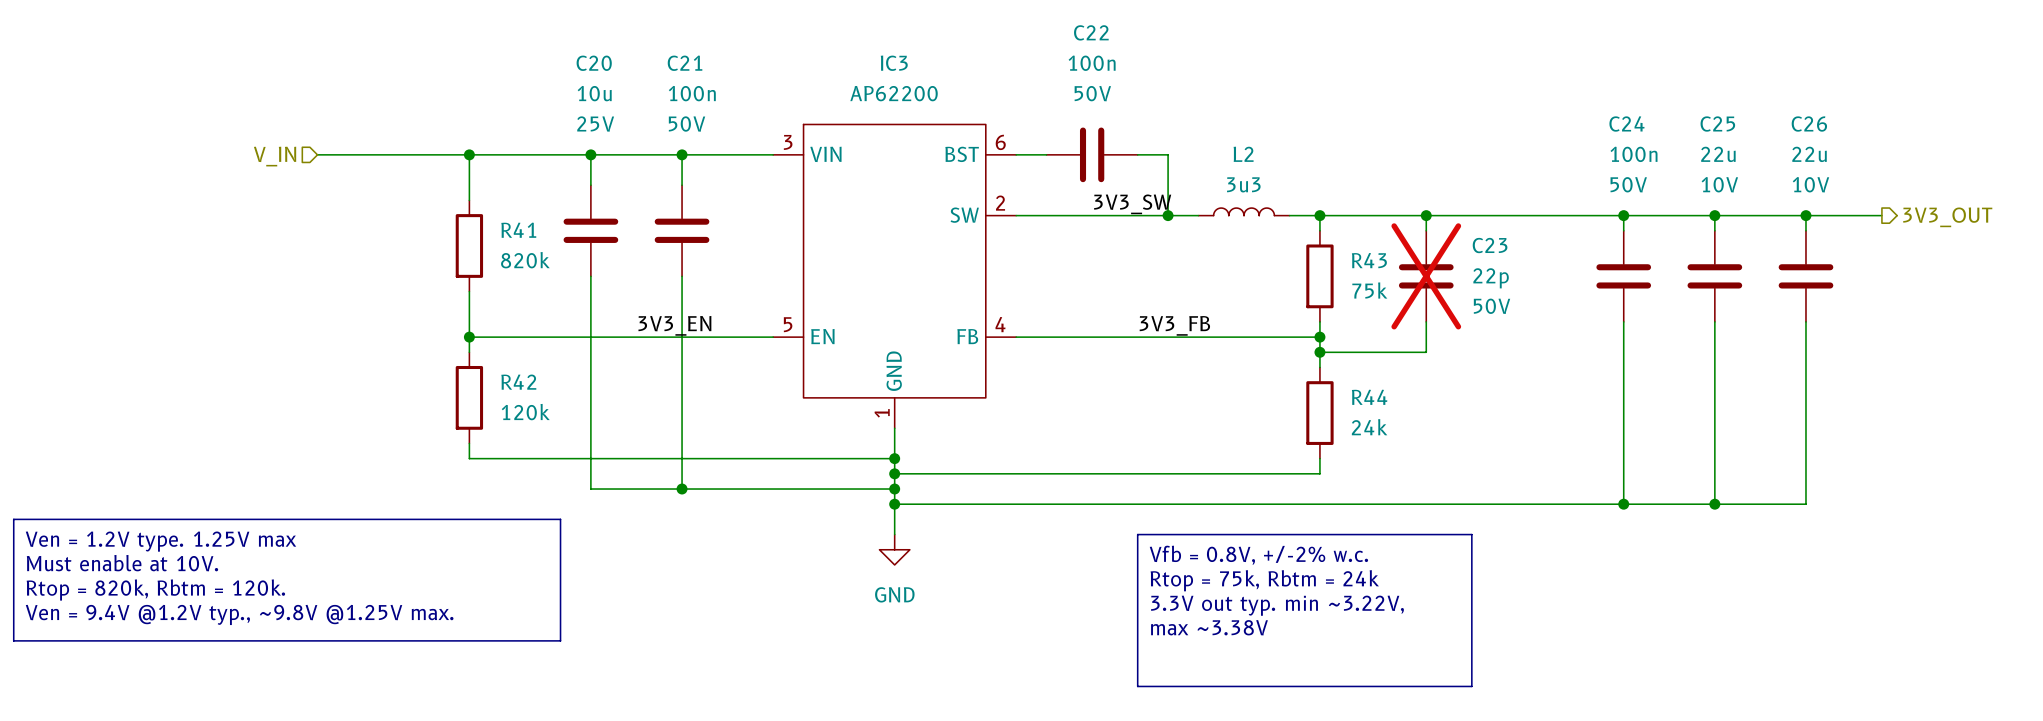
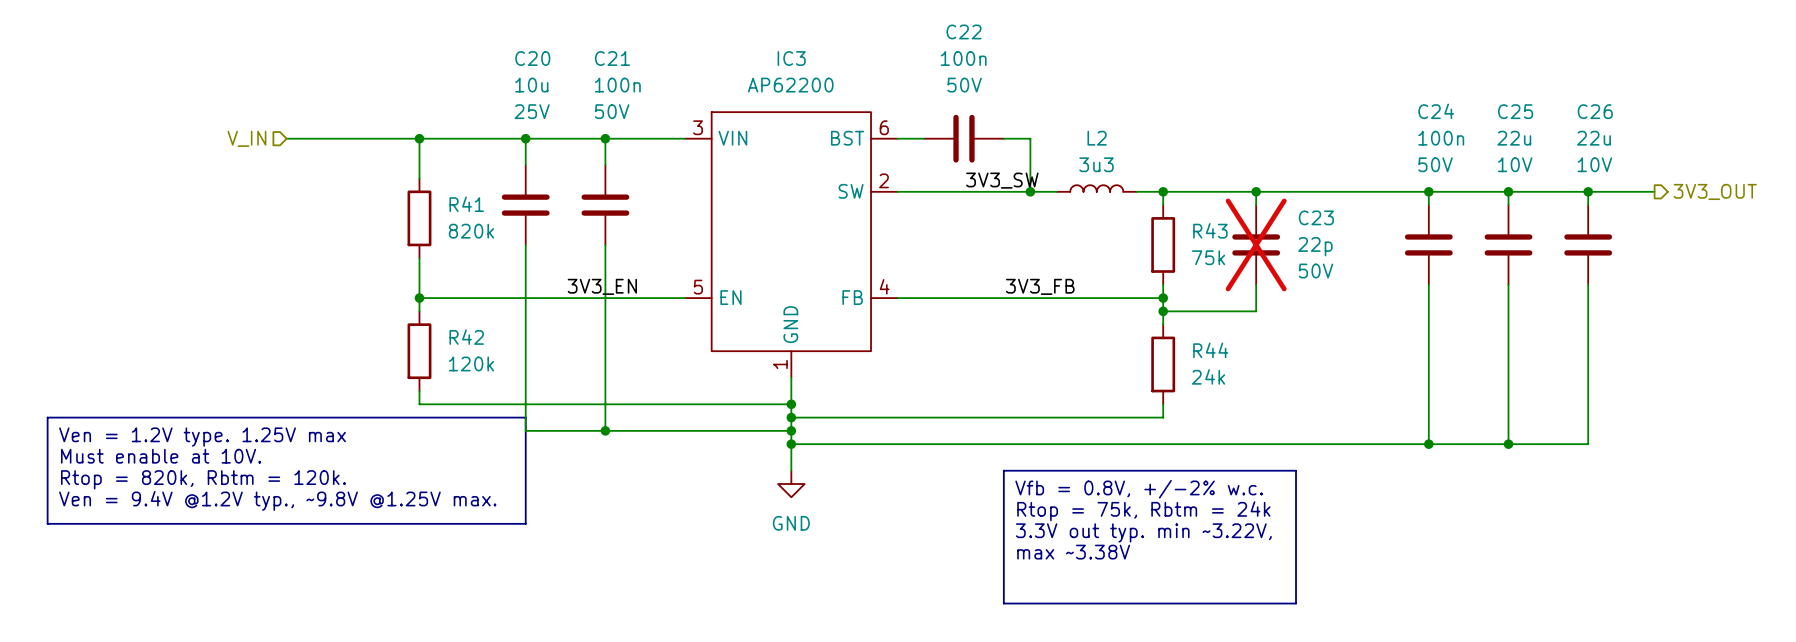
line: (13, 519) (560, 519) (560, 640) (13, 640) (13, 519) -> (47, 417) (525, 417) (525, 523) (47, 523) (47, 417)
text position: Ven = 1.2V type. 1.25V max (160, 541) -> Ven = 1.2V type. 1.25V max (202, 437)
text position: Must enable at 10V. (122, 563) -> Must enable at 10V. (161, 456)
text position: Rtop = 820k, Rbtm = 120k. (155, 590) -> Rtop = 820k, Rbtm = 120k. (203, 479)
text position: Ven = 9.4V @1.2V typ., ~9.8V @1.25V max. (239, 614) -> Ven = 9.4V @1.2V typ., ~9.8V @1.25V max. (277, 500)

